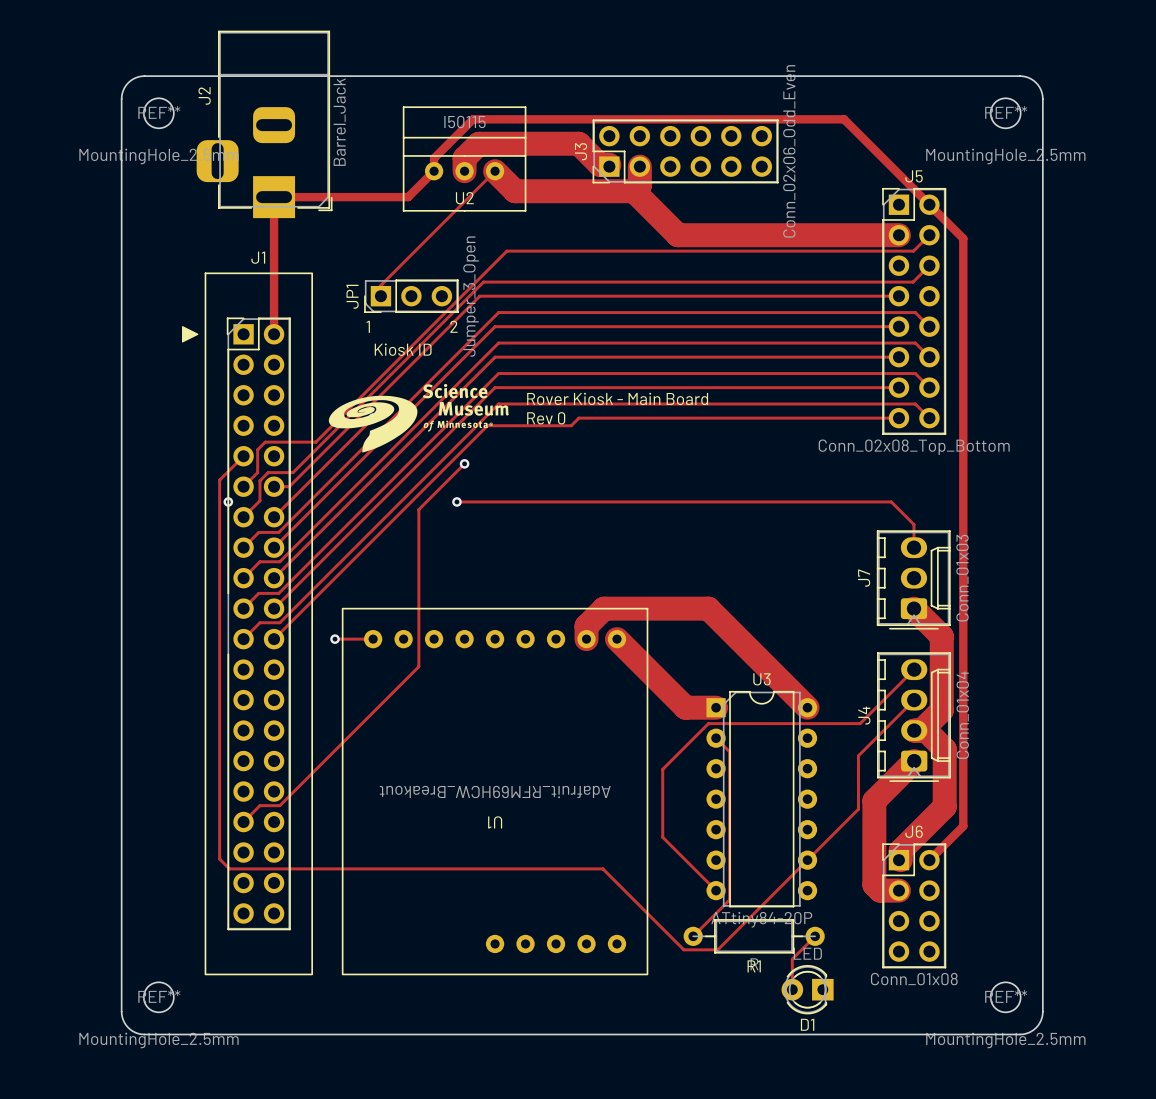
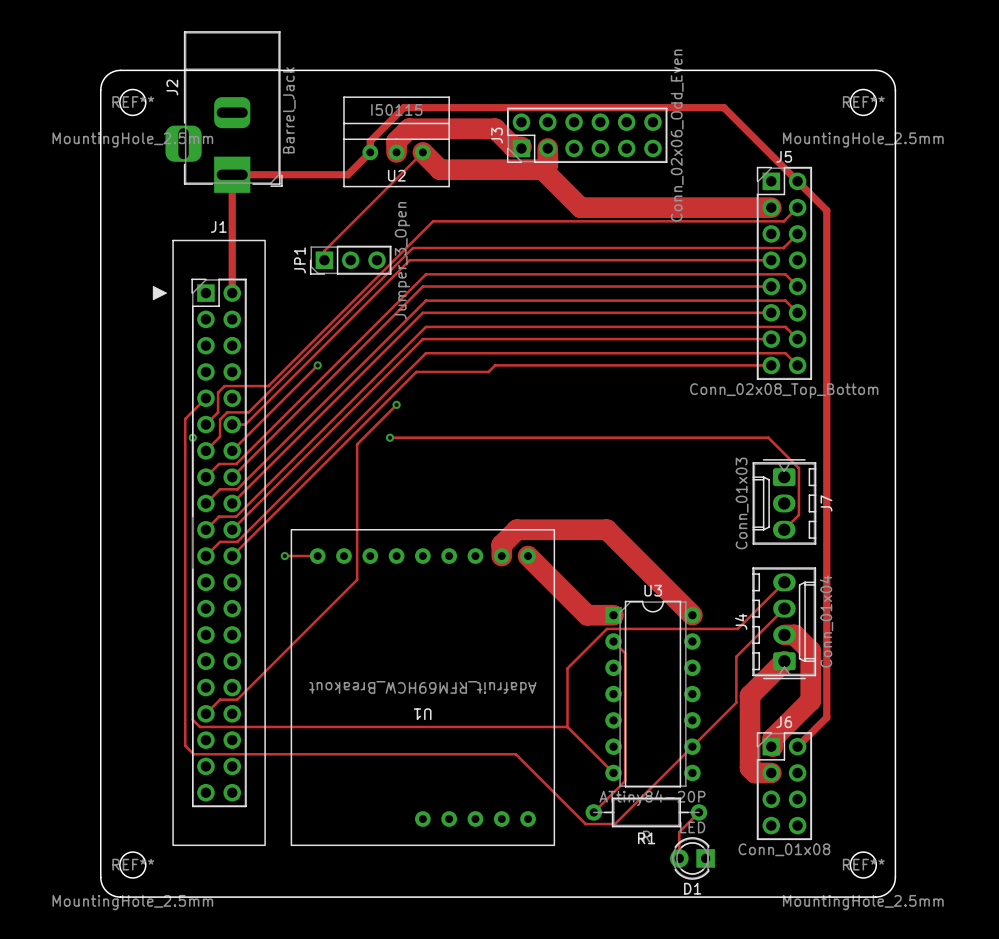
text: 1 (368, 326) -> none
text: 2 (453, 326) -> none
text: Kiosk ID (403, 349) -> none
drawing: [328, 383, 509, 453] -> none
text: Rover Kiosk - Main Board (617, 398) -> none
text: Rev 0 (546, 418) -> none
track: none -> (192, 437) (192, 719) (199, 726) (567, 726)
track: (891, 501) (913, 524) (913, 547) -> (764, 437) (768, 437) (798, 468) (798, 515) (784, 529)
J7 rotation: 0° (913, 579) -> 180° (784, 501)
track: (913, 608) (941, 636) (941, 710) (921, 730) -> none

